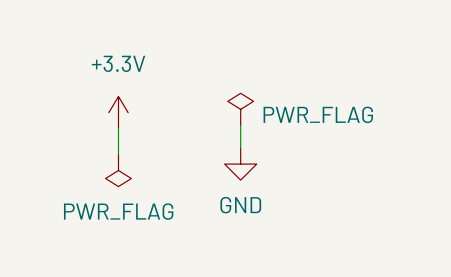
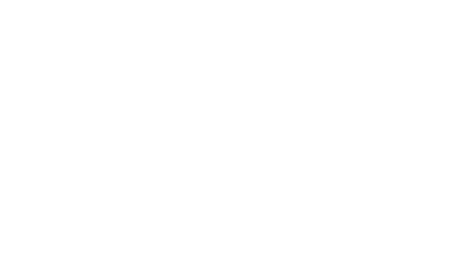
power symbol: PWR_FLAG (240, 109) -> none
power symbol: +3.3V (118, 112) -> none
wire: (240, 125) (240, 147) -> none
wire: (118, 128) (118, 154) -> none
power symbol: GND (240, 164) -> none
power symbol: PWR_FLAG (118, 170) -> none

